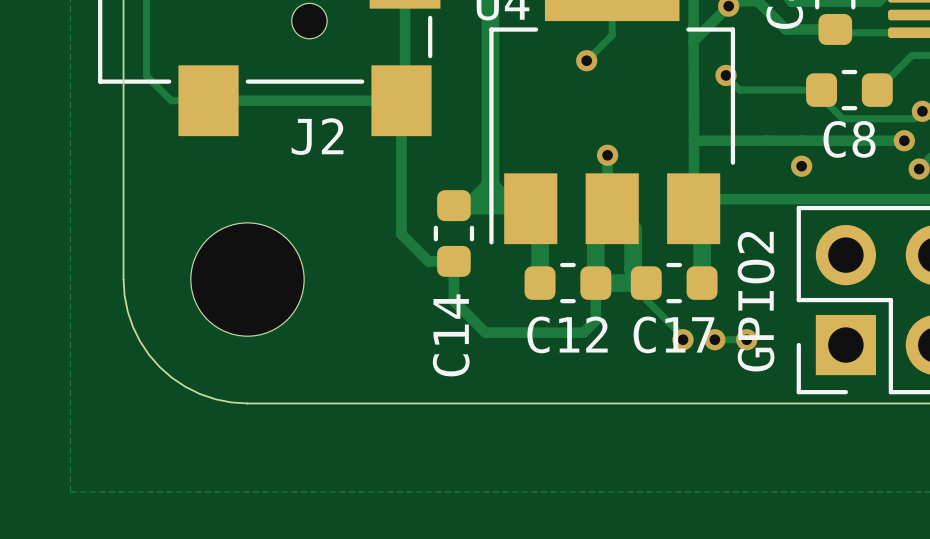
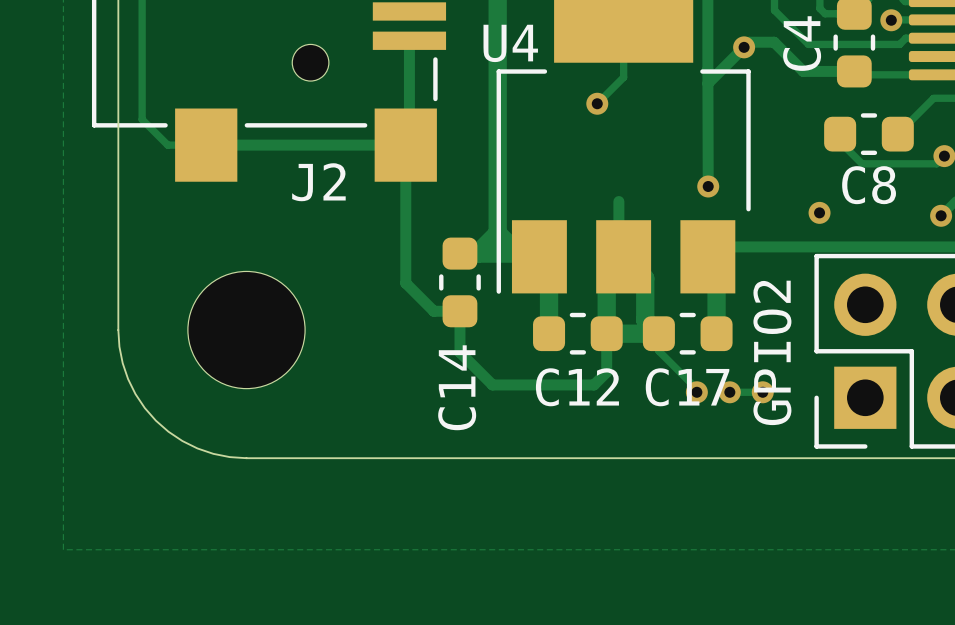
track: (724, 74) (739, 90) (821, 90) -> none
via: (726, 75) -> none
via: none -> (708, 186)
track: (904, 140) (693, 140) (693, 208) -> none
via: (904, 140) -> none
via: (607, 155) -> none

